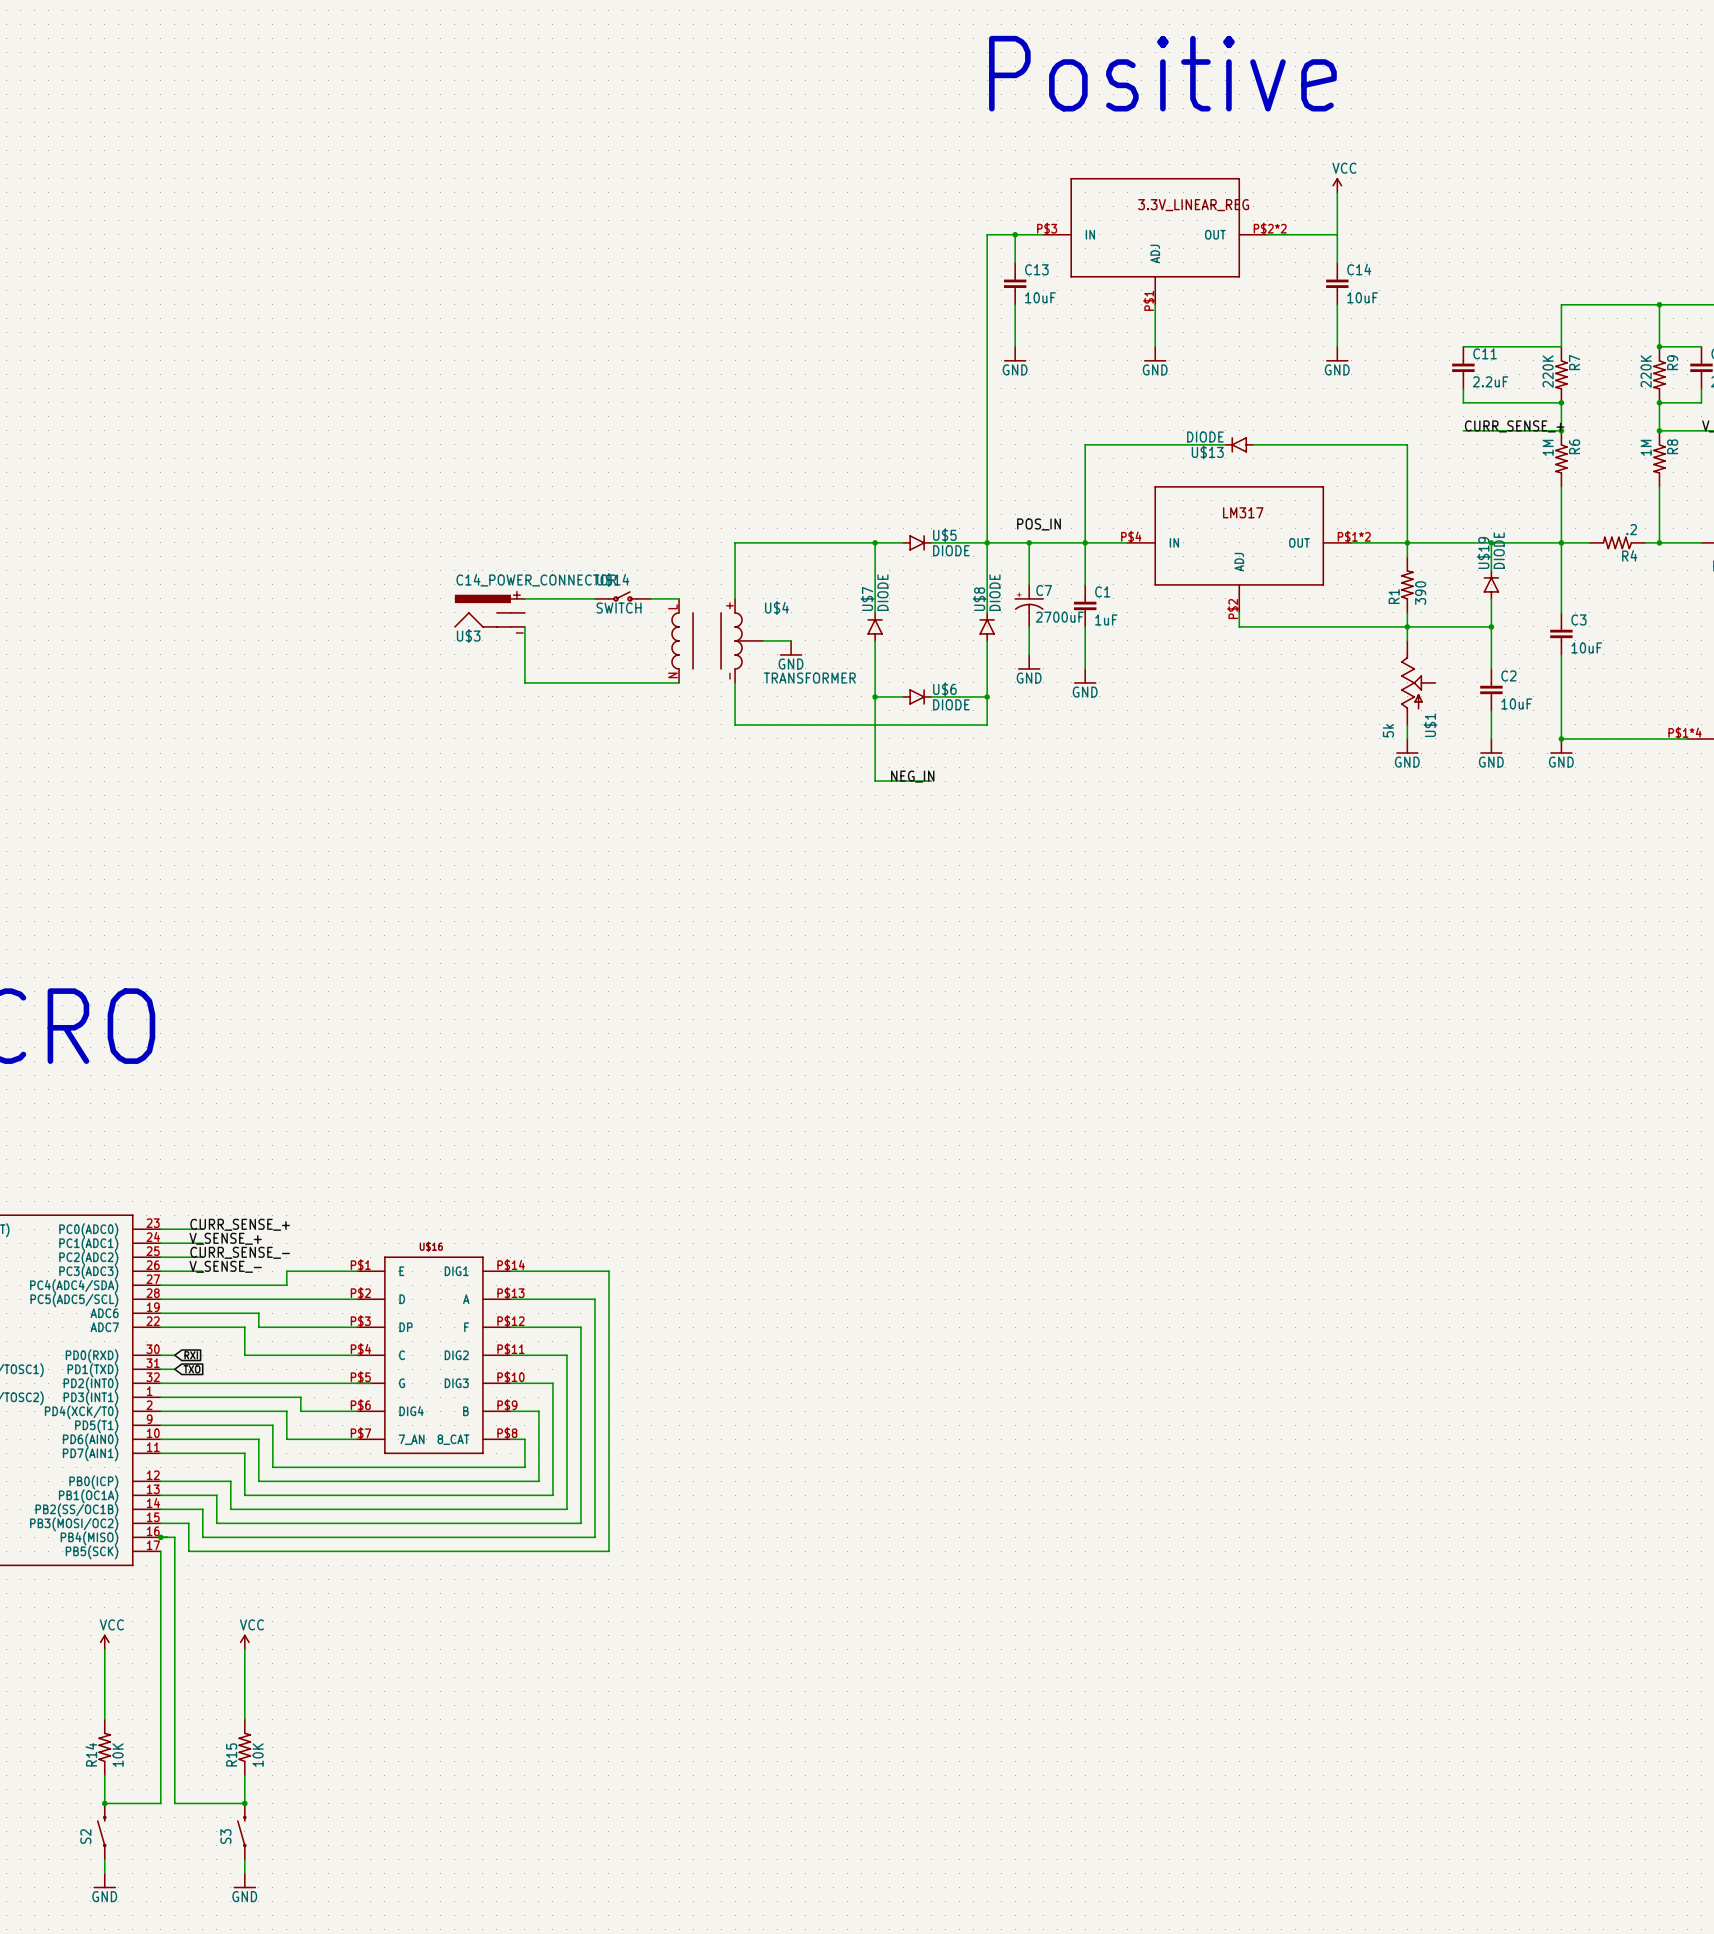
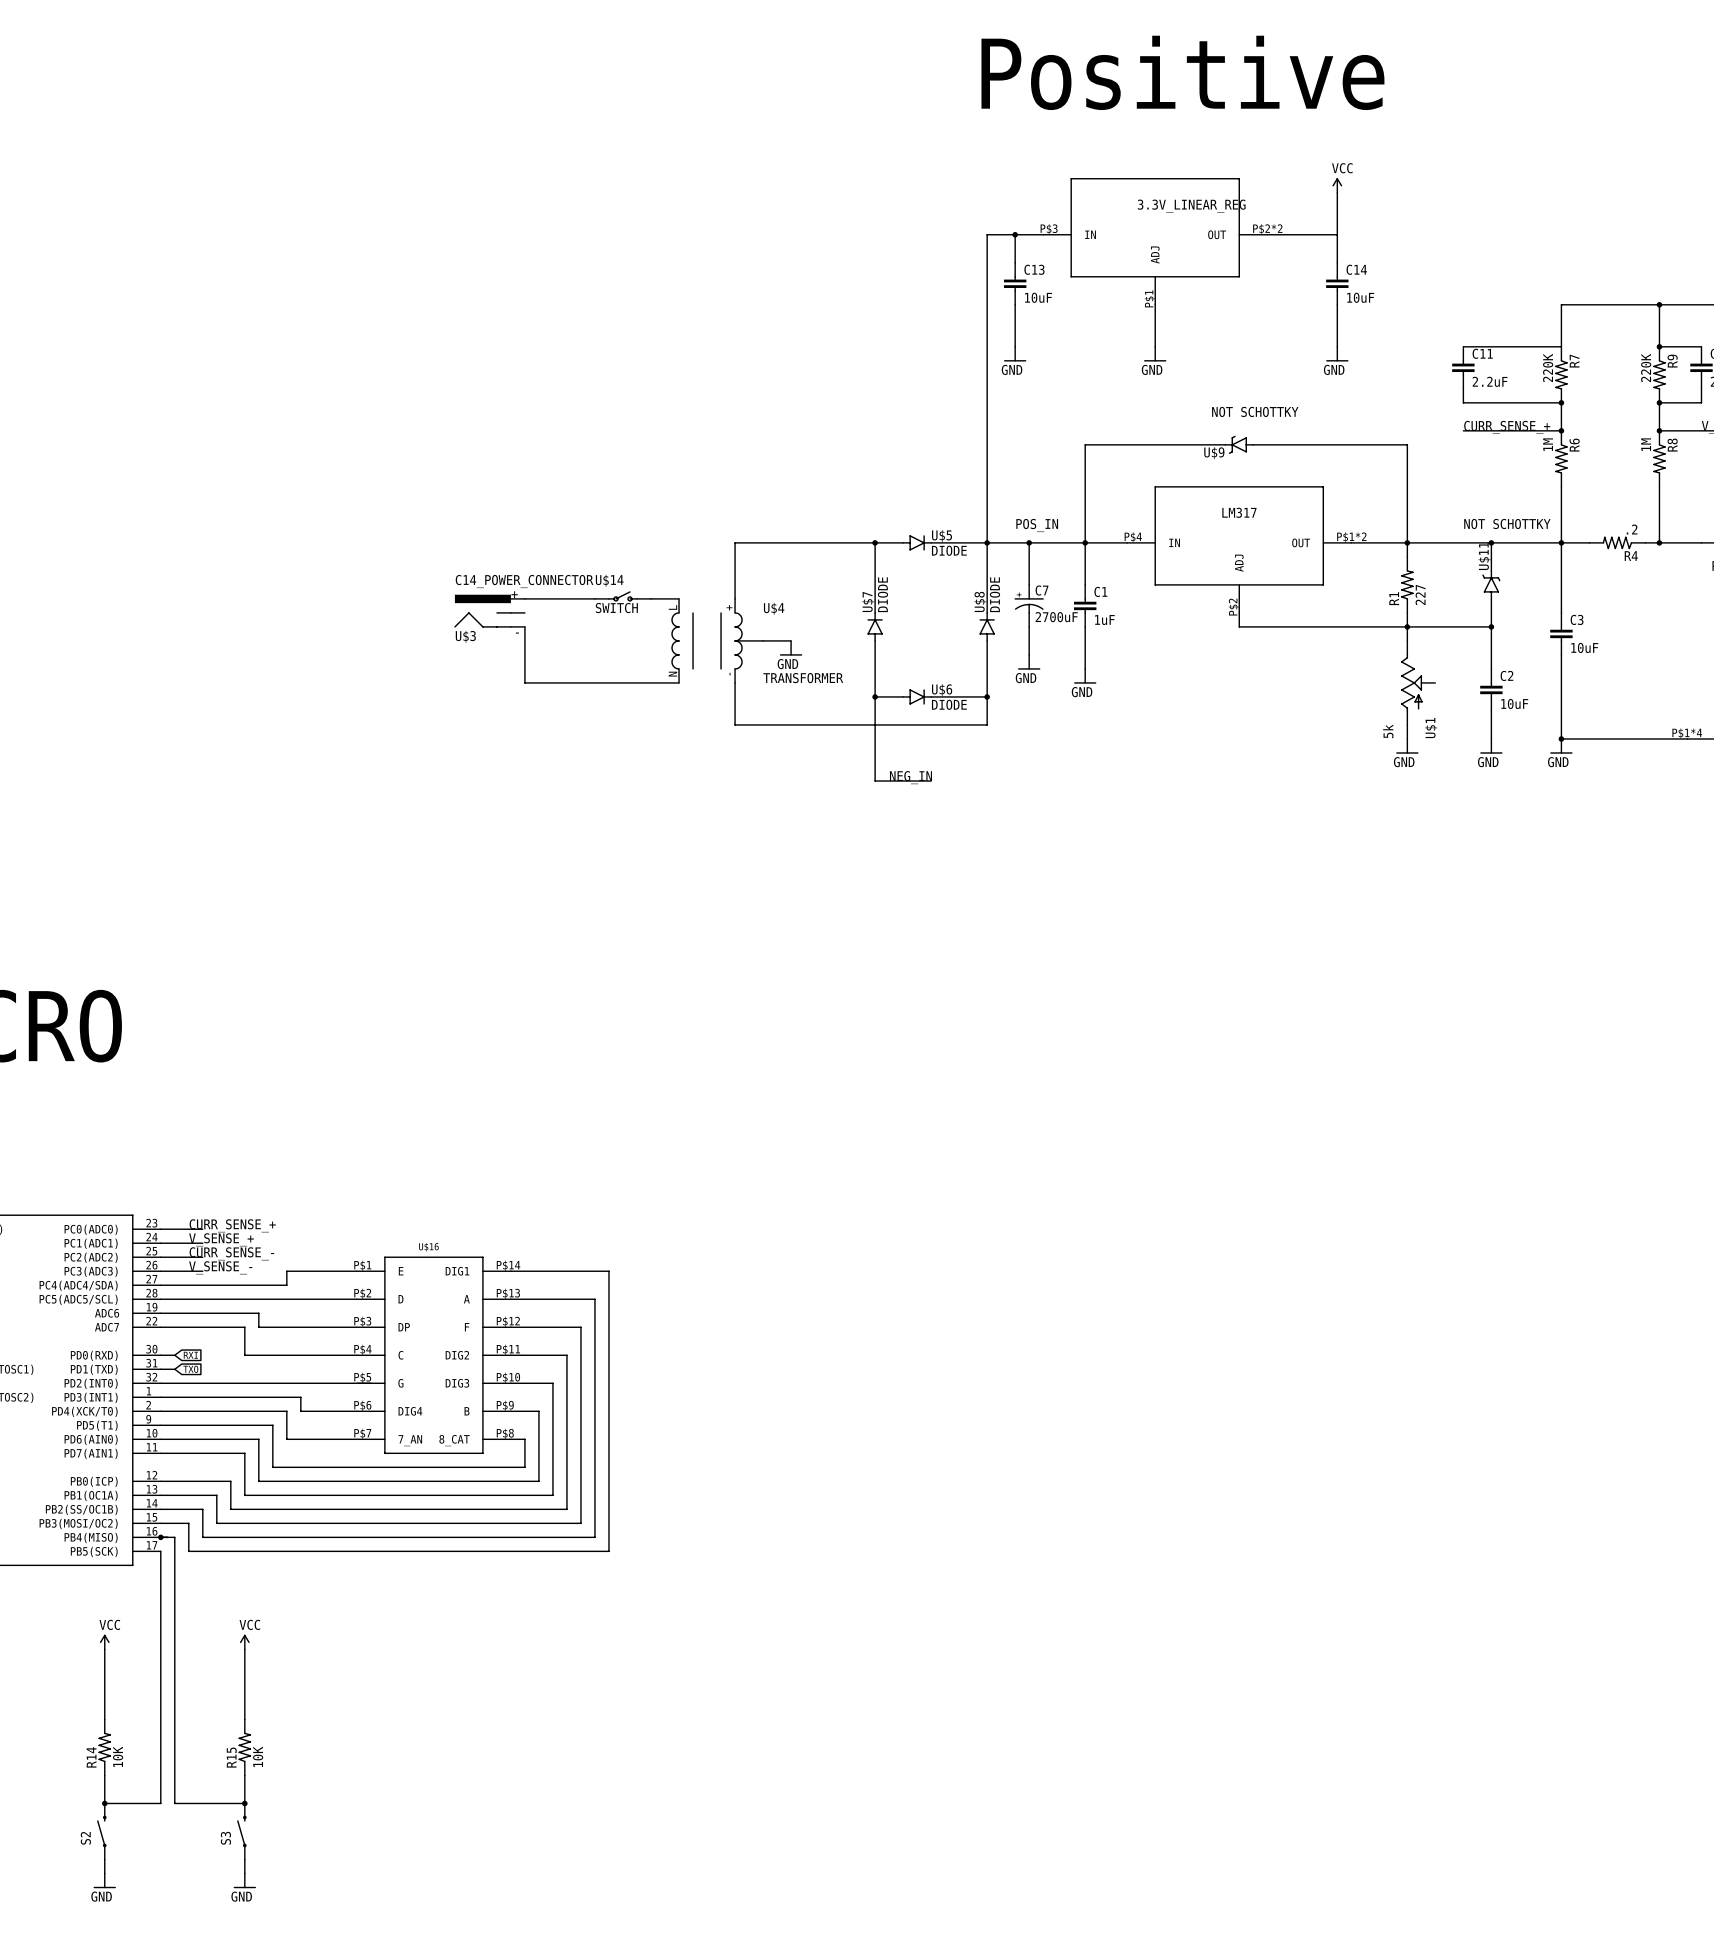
text: none -> NOT SCHOTTKY (1255, 411)
U$13: DIODE (1239, 444) -> none
U$9: none -> (1239, 444)
text: none -> NOT SCHOTTKY (1507, 524)
U$19: DIODE (1491, 584) -> none
U$11: none -> (1491, 584)
R1 value: 390 (1420, 593) -> 227 (1420, 595)

